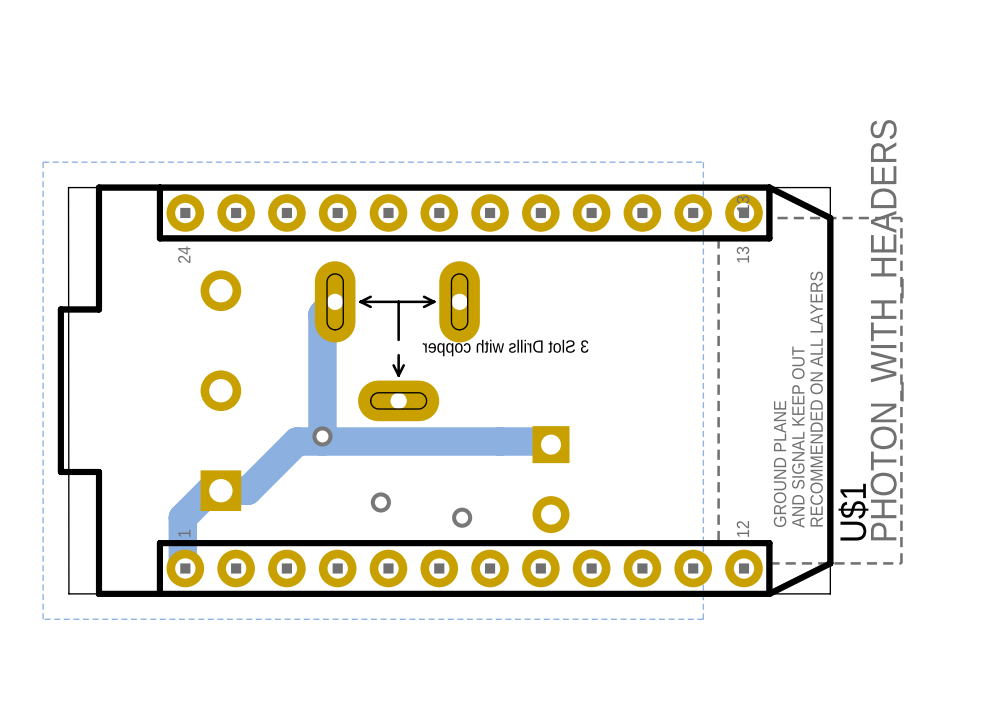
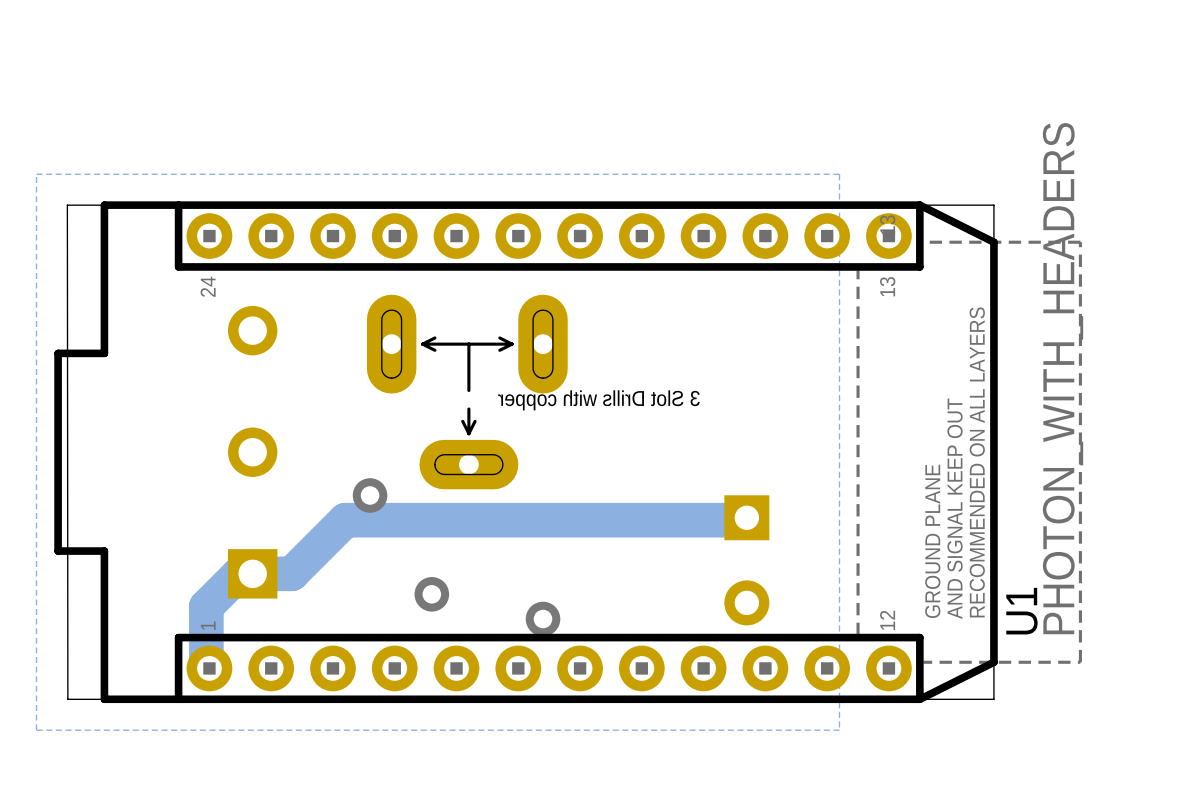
track: (335, 301) (322, 314) (322, 441) -> none
via size: [312, 426, 333, 447] -> [352, 478, 388, 513]
track: (551, 444) (547, 441) (297, 441) (247, 490) -> (746, 517) (744, 520) (345, 520) (291, 573) (285, 573)
part position: (551, 479) -> (746, 560)
via size: [370, 492, 391, 513] -> [414, 577, 450, 612]
via size: [452, 507, 473, 528] -> [525, 601, 561, 637]
U$1 name: U$1 (853, 512) -> U1 (1021, 611)

